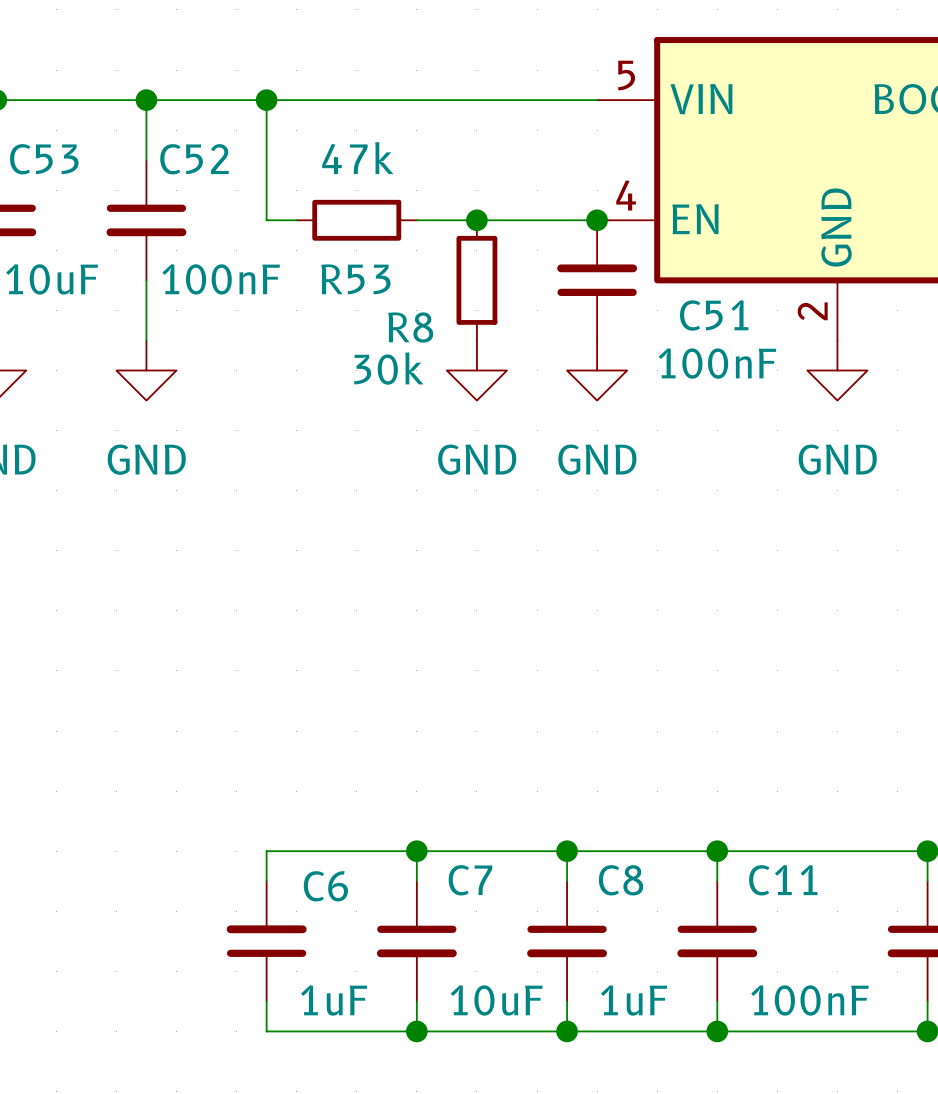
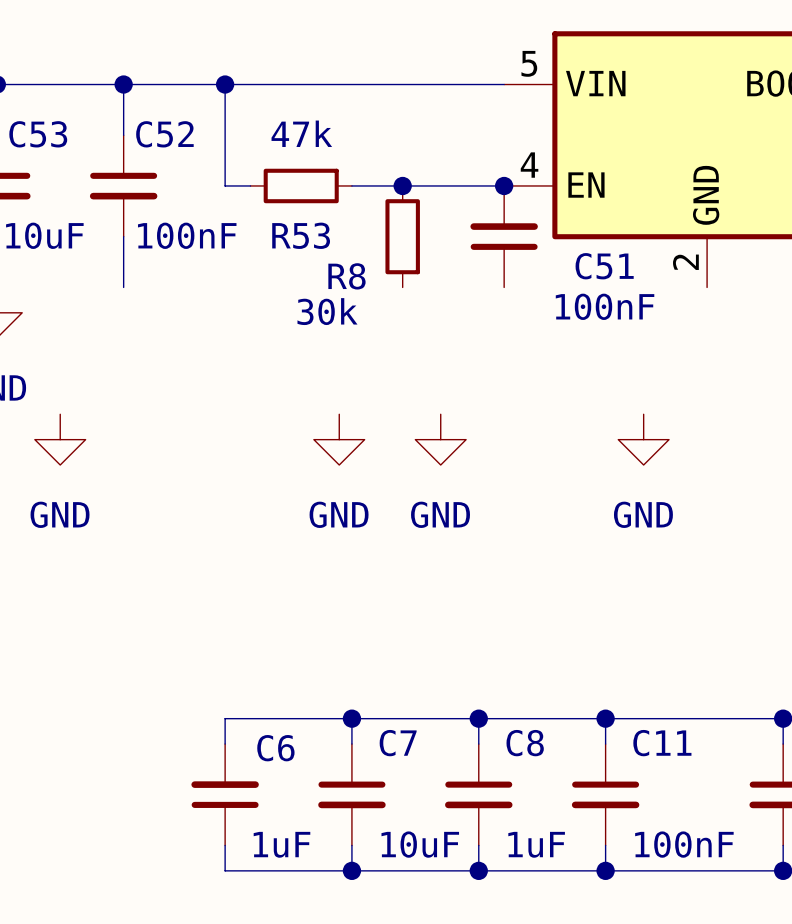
power symbol: GND (146, 370) -> none
power symbol: GND (476, 370) -> none
power symbol: GND (597, 370) -> none
power symbol: GND (837, 370) -> none
power symbol: none -> GND (60, 439)
power symbol: none -> GND (339, 439)
power symbol: none -> GND (440, 439)
power symbol: none -> GND (643, 439)

